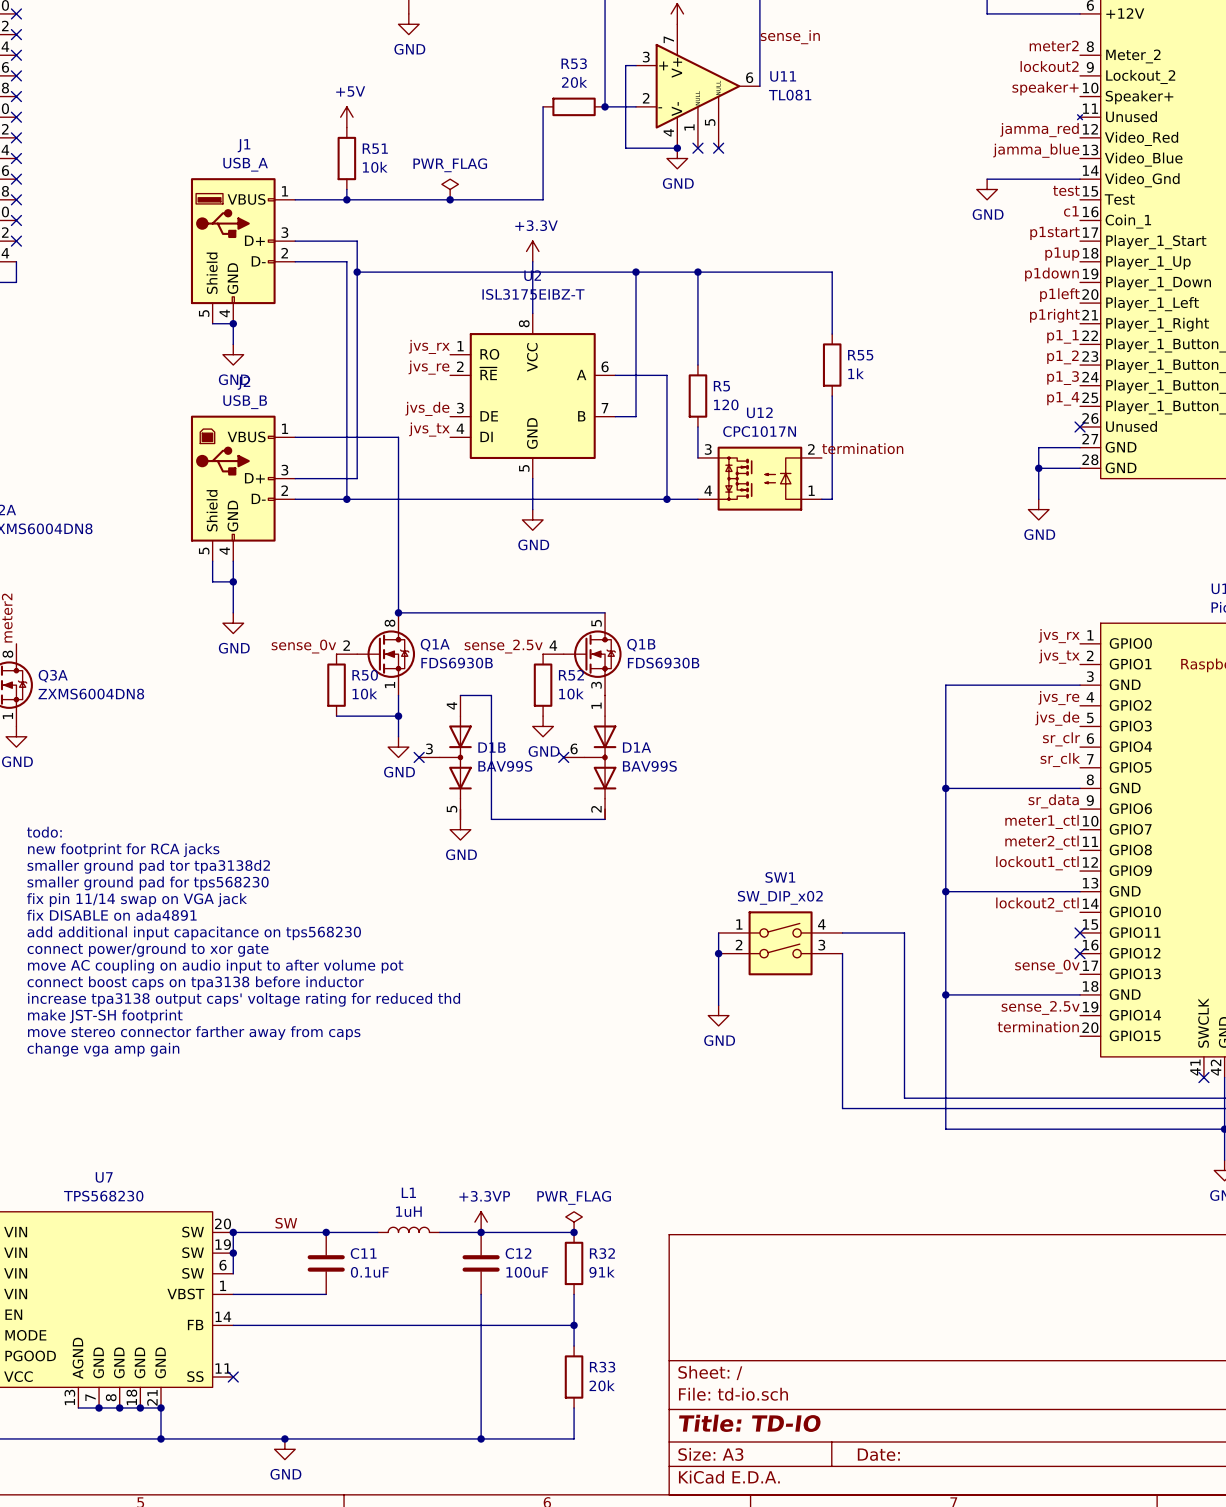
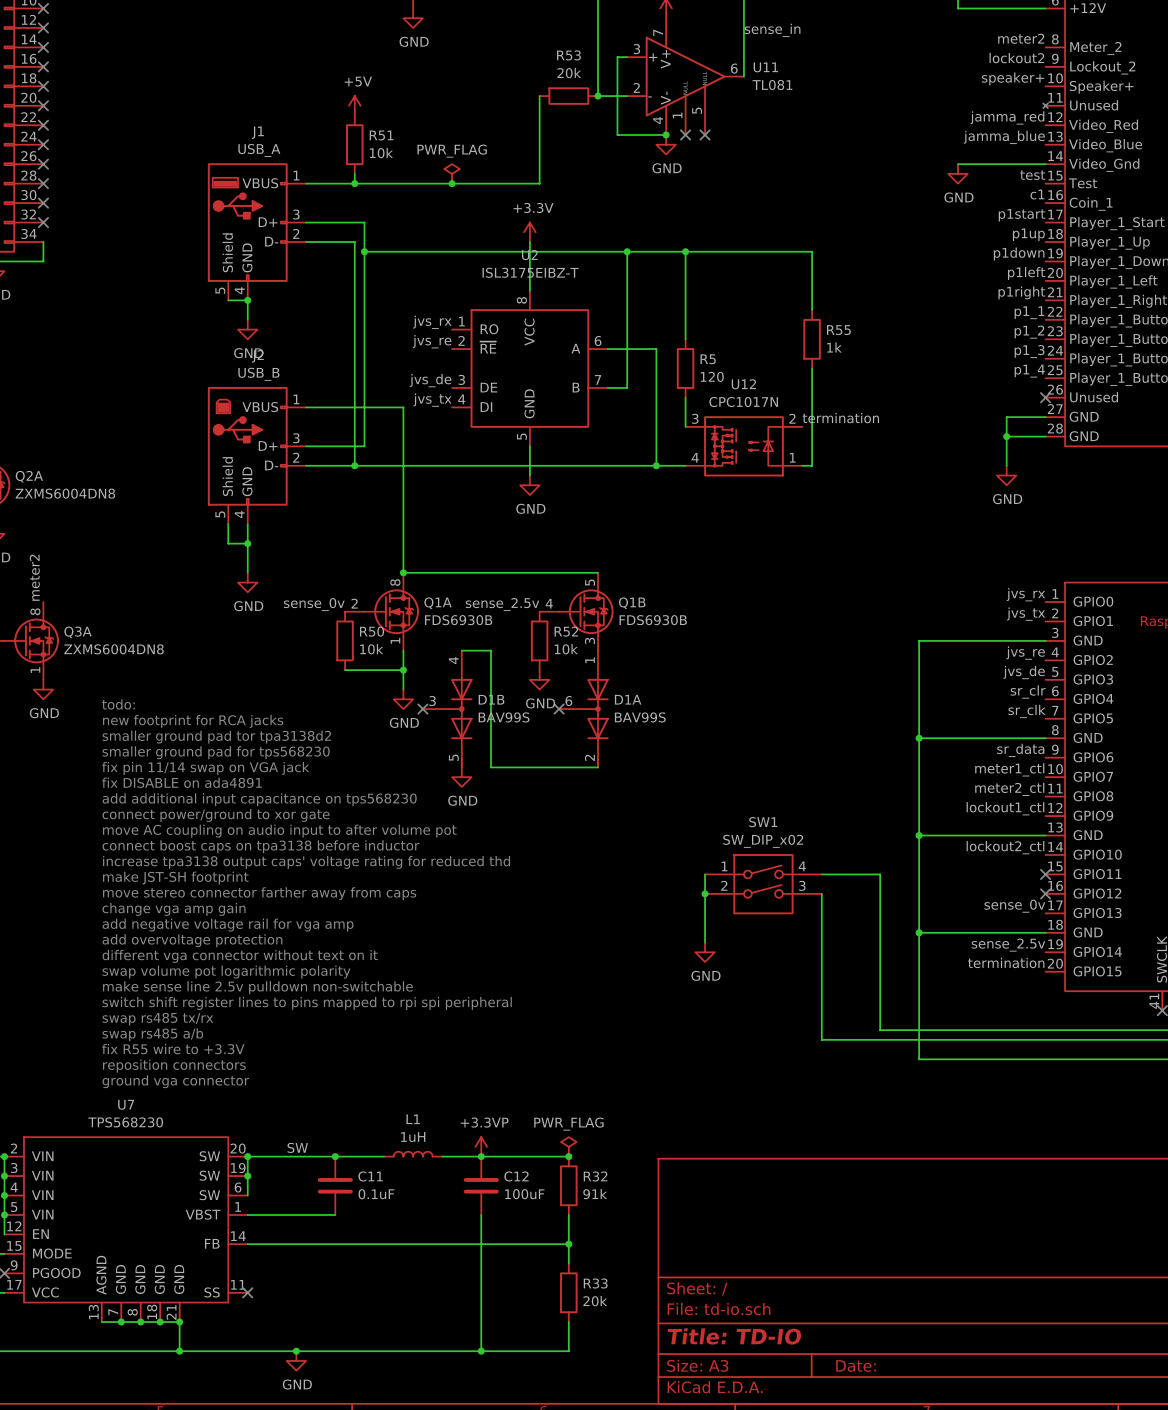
text position: todo: (44, 832) -> todo: (118, 704)
text position: new footprint for RCA jacks (123, 850) -> new footprint for RCA jacks (193, 721)
text position: smaller ground pad tor tpa3138d2 (148, 866) -> smaller ground pad tor tpa3138d2 (216, 737)
text position: smaller ground pad for tps568230 (148, 883) -> smaller ground pad for tps568230 (216, 752)
text position: fix pin 11/14 swap on VGA jack (137, 900) -> fix pin 11/14 swap on VGA jack (205, 768)
text position: fix DISABLE on ada4891 (111, 915) -> fix DISABLE on ada4891 (181, 782)
text position: add additional input capacitance on tps568230 (194, 933) -> add additional input capacitance on tps568230 (259, 799)
text position: connect power/ground to xor gate (148, 949) -> connect power/ground to xor gate (216, 815)
text position: move AC coupling on audio input to after volume pot (215, 966) -> move AC coupling on audio input to after volume pot (279, 831)
text position: connect boost caps on tpa3138 before inductor (195, 983) -> connect boost caps on tpa3138 before inductor (260, 846)
text: none -> add negative voltage rail for vga amp (228, 925)
text position: increase tpa3138 output caps' voltage rating for reduced thd (244, 999) -> increase tpa3138 output caps' voltage rating for reduced thd (306, 862)
text: none -> add overvoltage protection (192, 940)
text position: make JST-SH footprint (105, 1016) -> make JST-SH footprint (175, 878)
text: none -> different vga connector without text on it (240, 956)
text position: move stereo connector farther away from caps (194, 1033) -> move stereo connector farther away from caps (259, 893)
text: none -> swap volume pot logarithmic polarity (226, 972)
text position: change vga amp gain (103, 1049) -> change vga amp gain (174, 909)
text: none -> make sense line 2.5v pulldown non-switchable (257, 987)
text: none -> switch shift register lines to pins mapped to rpi spi peripheral (307, 1003)
text: none -> swap rs485 tx/rx (157, 1019)
text: none -> swap rs485 a/b (152, 1034)
text: none -> fix R55 wire to +3.3V (173, 1049)
text: none -> reposition connectors (174, 1066)
text: none -> ground vga connector (175, 1081)

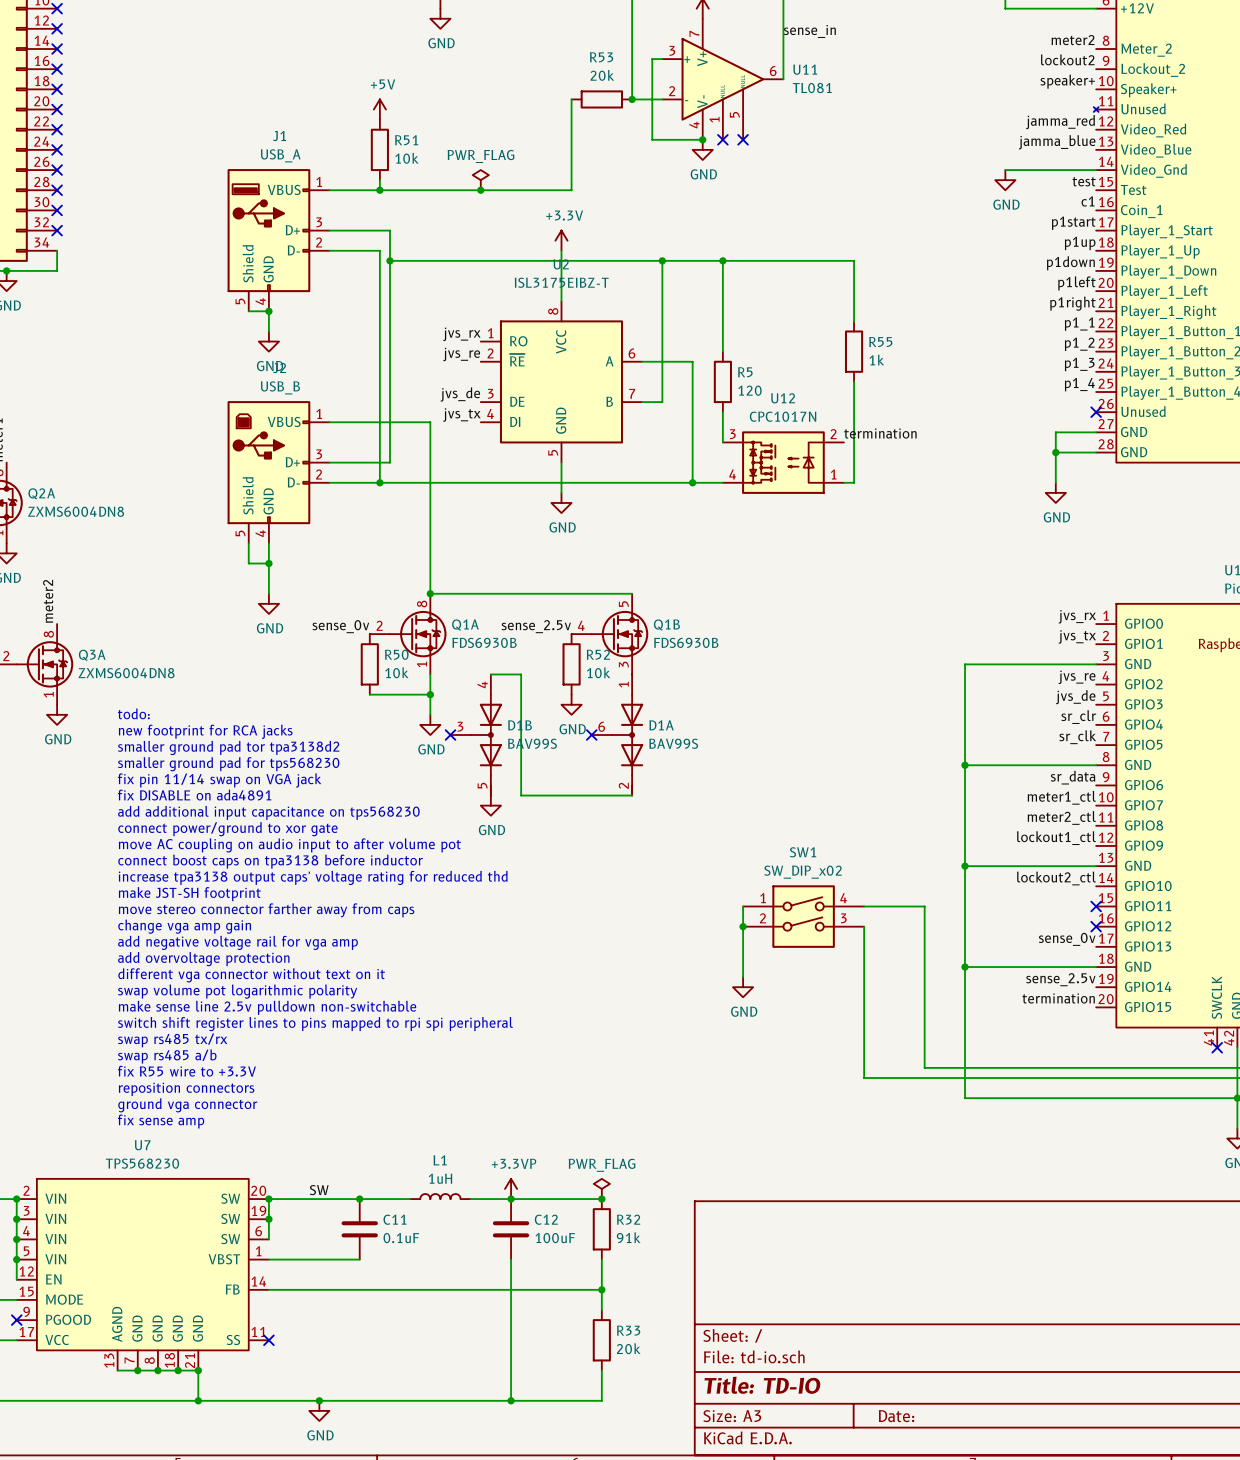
text: none -> todo: (133, 713)
text: todo: (118, 704) -> new footprint for RCA jacks (205, 731)
text: new footprint for RCA jacks (193, 721) -> smaller ground pad tor tpa3138d2 (228, 747)
text: smaller ground pad tor tpa3138d2 (216, 737) -> smaller ground pad for tps568230 (228, 764)
text: smaller ground pad for tps568230 (216, 752) -> fix pin 11/14 swap on VGA jack (219, 780)
text: fix pin 11/14 swap on VGA jack (205, 768) -> fix DISABLE on ada4891 (194, 795)
text: fix DISABLE on ada4891 (181, 782) -> add additional input capacitance on tps568230 (268, 812)
text: add additional input capacitance on tps568230 (259, 799) -> connect power/ground to xor gate (227, 829)
text: connect power/ground to xor gate (216, 815) -> move AC coupling on audio input to after volume pot (289, 845)
text: move AC coupling on audio input to after volume pot (279, 831) -> connect boost caps on tpa3138 before inductor (270, 861)
text: connect boost caps on tpa3138 before inductor (260, 846) -> increase tpa3138 output caps' voltage rating for reduced thd (313, 877)
text: increase tpa3138 output caps' voltage rating for reduced thd (306, 862) -> make JST-SH footprint (189, 894)
text: make JST-SH footprint (175, 878) -> move stereo connector farther away from caps (266, 910)
text: move stereo connector farther away from caps (259, 893) -> change vga amp gain (184, 926)
text: change vga amp gain (174, 909) -> add negative voltage rail for vga amp (237, 942)
text: add negative voltage rail for vga amp (228, 925) -> add overvoltage protection (203, 959)
text: add overvoltage protection (192, 940) -> different vga connector without text on it (251, 975)
text: different vga connector without text on it (240, 956) -> swap volume pot logarithmic polarity (237, 991)
text: swap volume pot logarithmic polarity (226, 972) -> make sense line 2.5v pulldown non-switchable (267, 1007)
text: make sense line 2.5v pulldown non-switchable (257, 987) -> switch shift register lines to pins mapped to rpi spi peripheral (315, 1024)
text: switch shift register lines to pins mapped to rpi spi peripheral (307, 1003) -> swap rs485 tx/rx (172, 1040)
text: swap rs485 tx/rx (157, 1019) -> swap rs485 a/b (167, 1056)
text: swap rs485 a/b (152, 1034) -> fix R55 wire to +3.3V (186, 1071)
text: fix R55 wire to +3.3V (173, 1049) -> reposition connectors (186, 1089)
text: reposition connectors (174, 1066) -> ground vga connector (187, 1105)
text: ground vga connector (175, 1081) -> fix sense amp (161, 1121)

